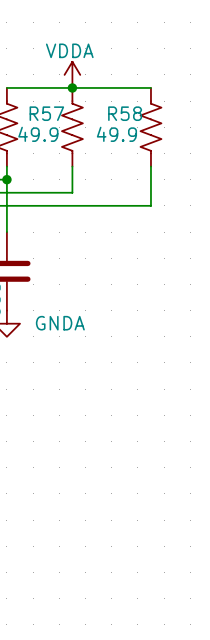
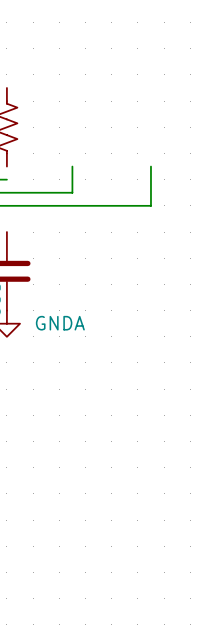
power symbol: VDDA (72, 74) -> none
wire: (6, 87) (150, 87) -> none
junction: (72, 87) -> none
R57: 49.9 (72, 127) -> none
R58: 49.9 (150, 127) -> none
wire: (6, 166) (6, 232) -> none
junction: (6, 179) -> none

